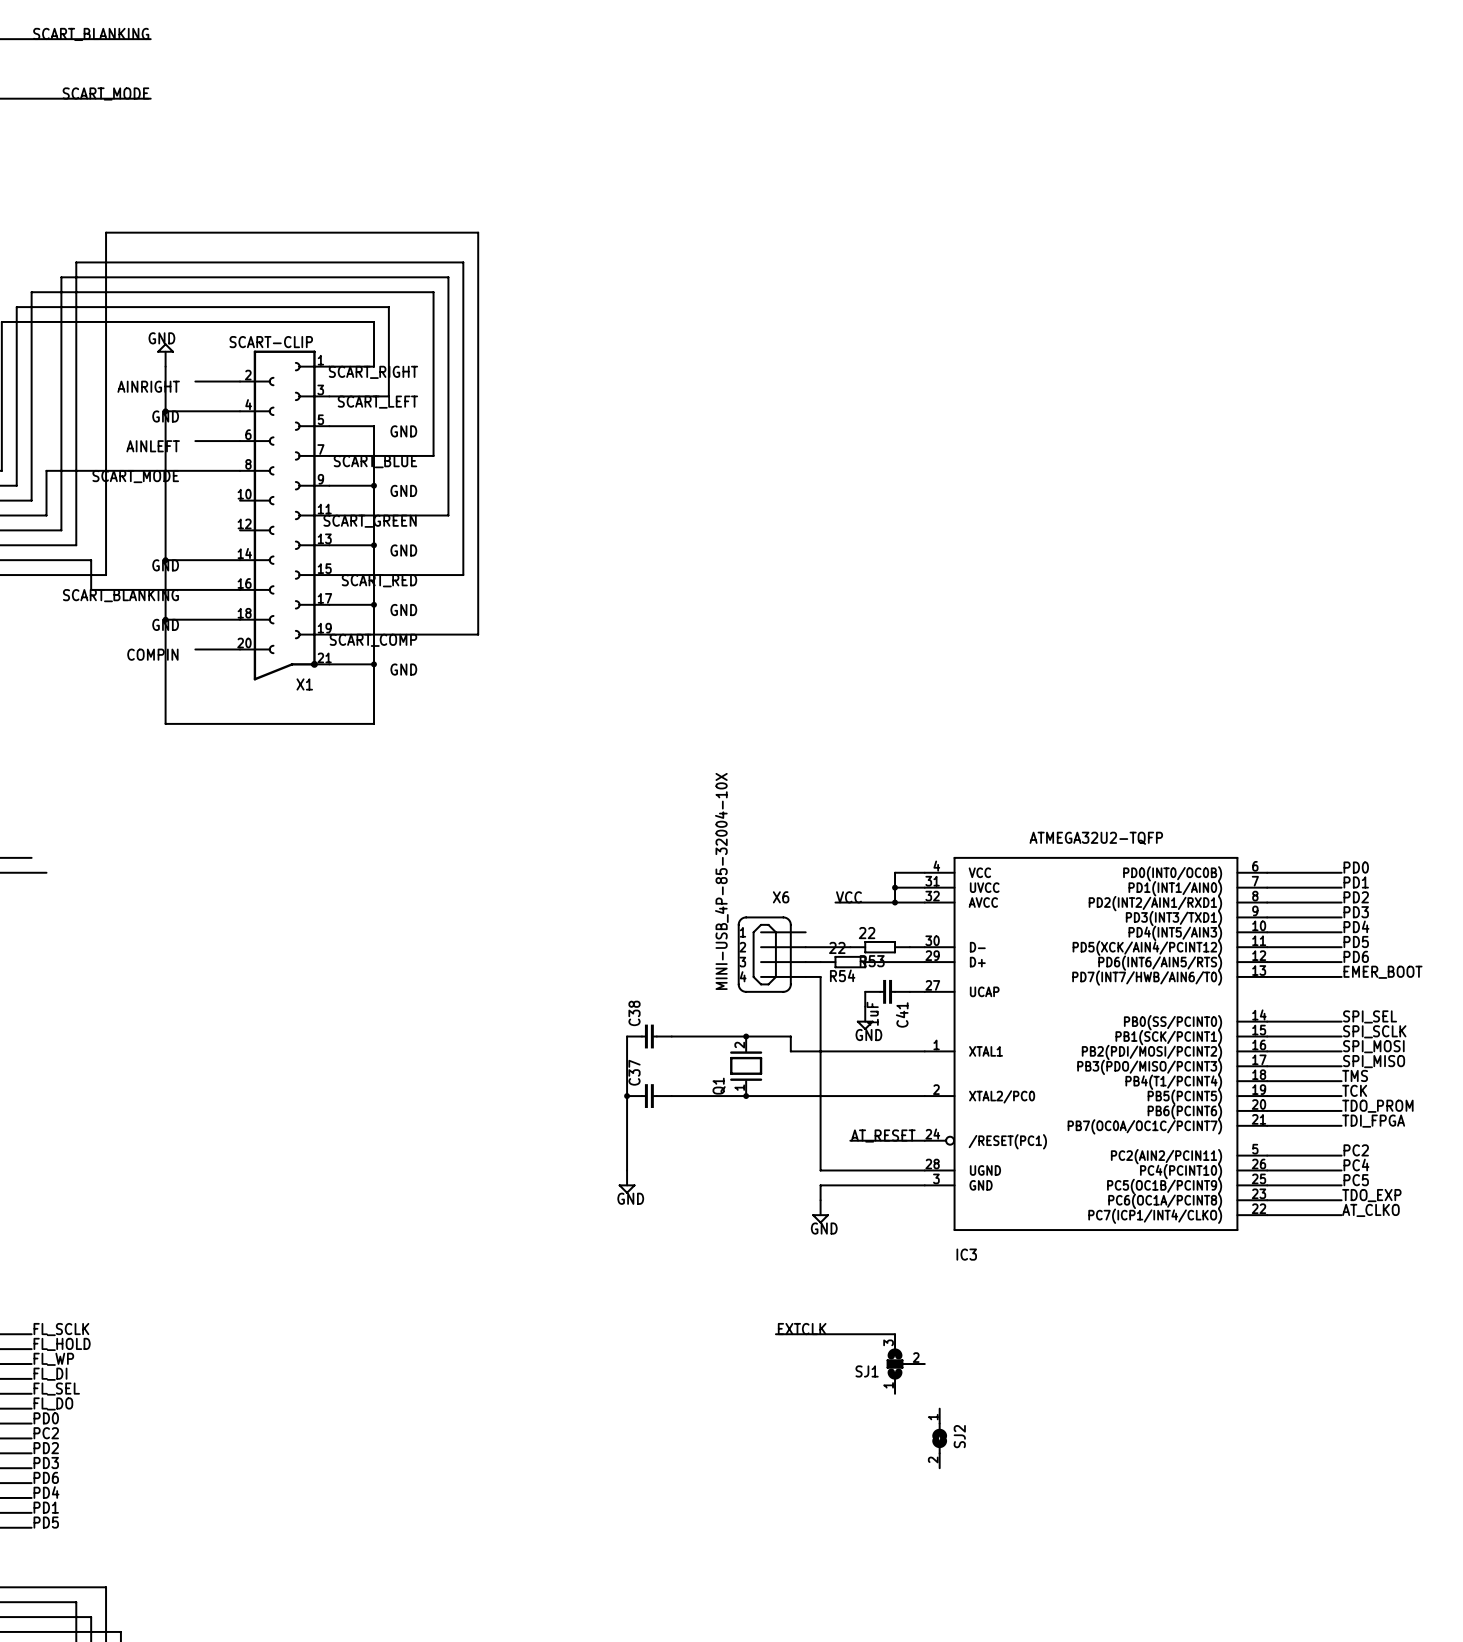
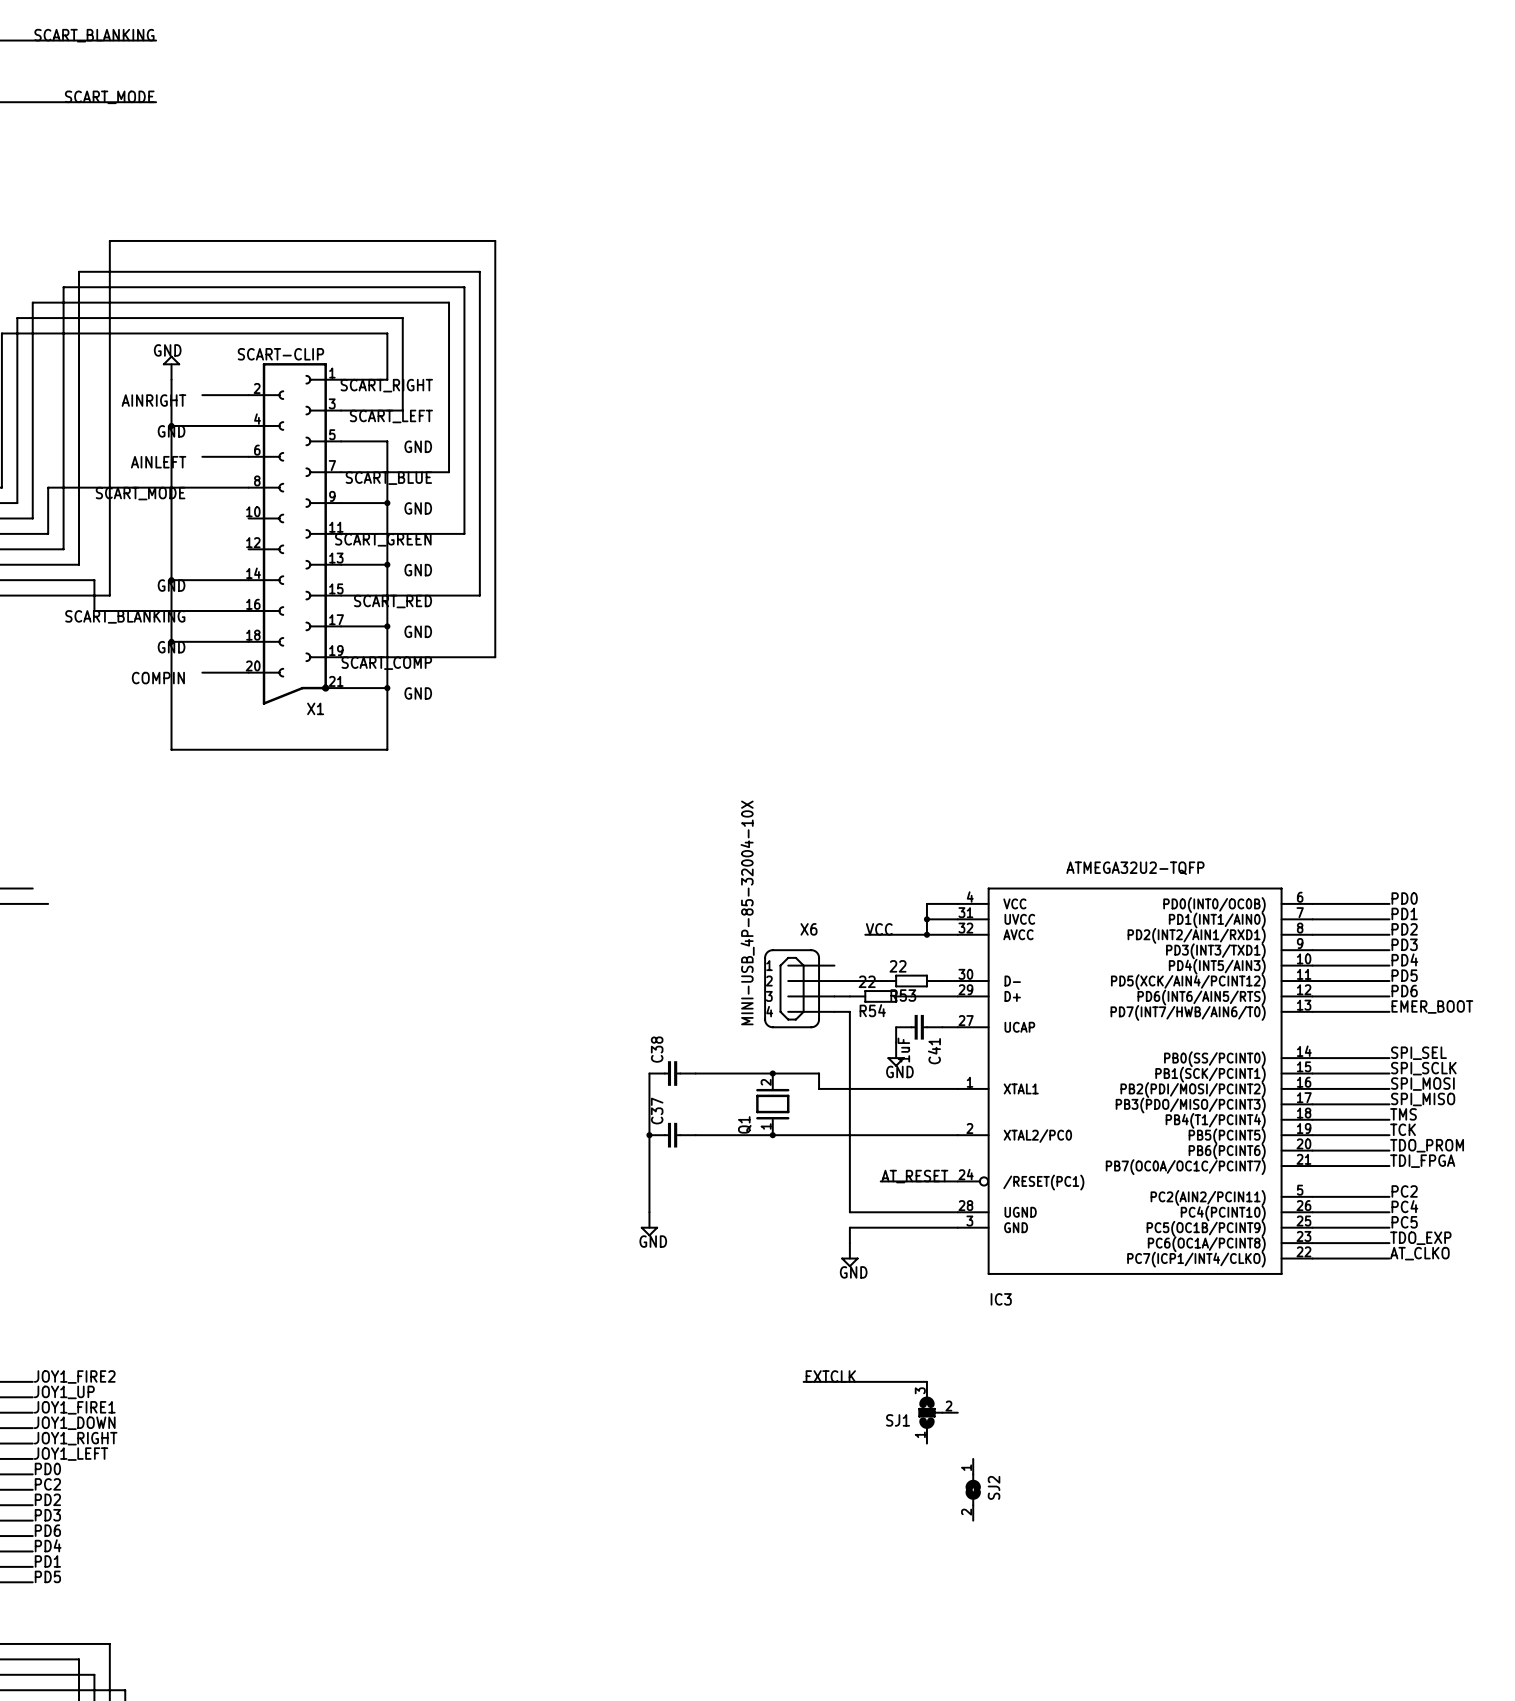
label: FL_SCLK (61, 1329) -> JOY1_FIRE2 (74, 1376)
label: FL_HOLD (62, 1344) -> JOY1_UP (64, 1392)
label: FL_WP (53, 1359) -> JOY1_FIRE1 (74, 1407)
label: FL_DI (50, 1374) -> JOY1_DOWN (74, 1423)
label: FL_SEL (56, 1389) -> JOY1_RIGHT (75, 1438)
label: FL_DO (53, 1403) -> JOY1_LEFT (71, 1454)

